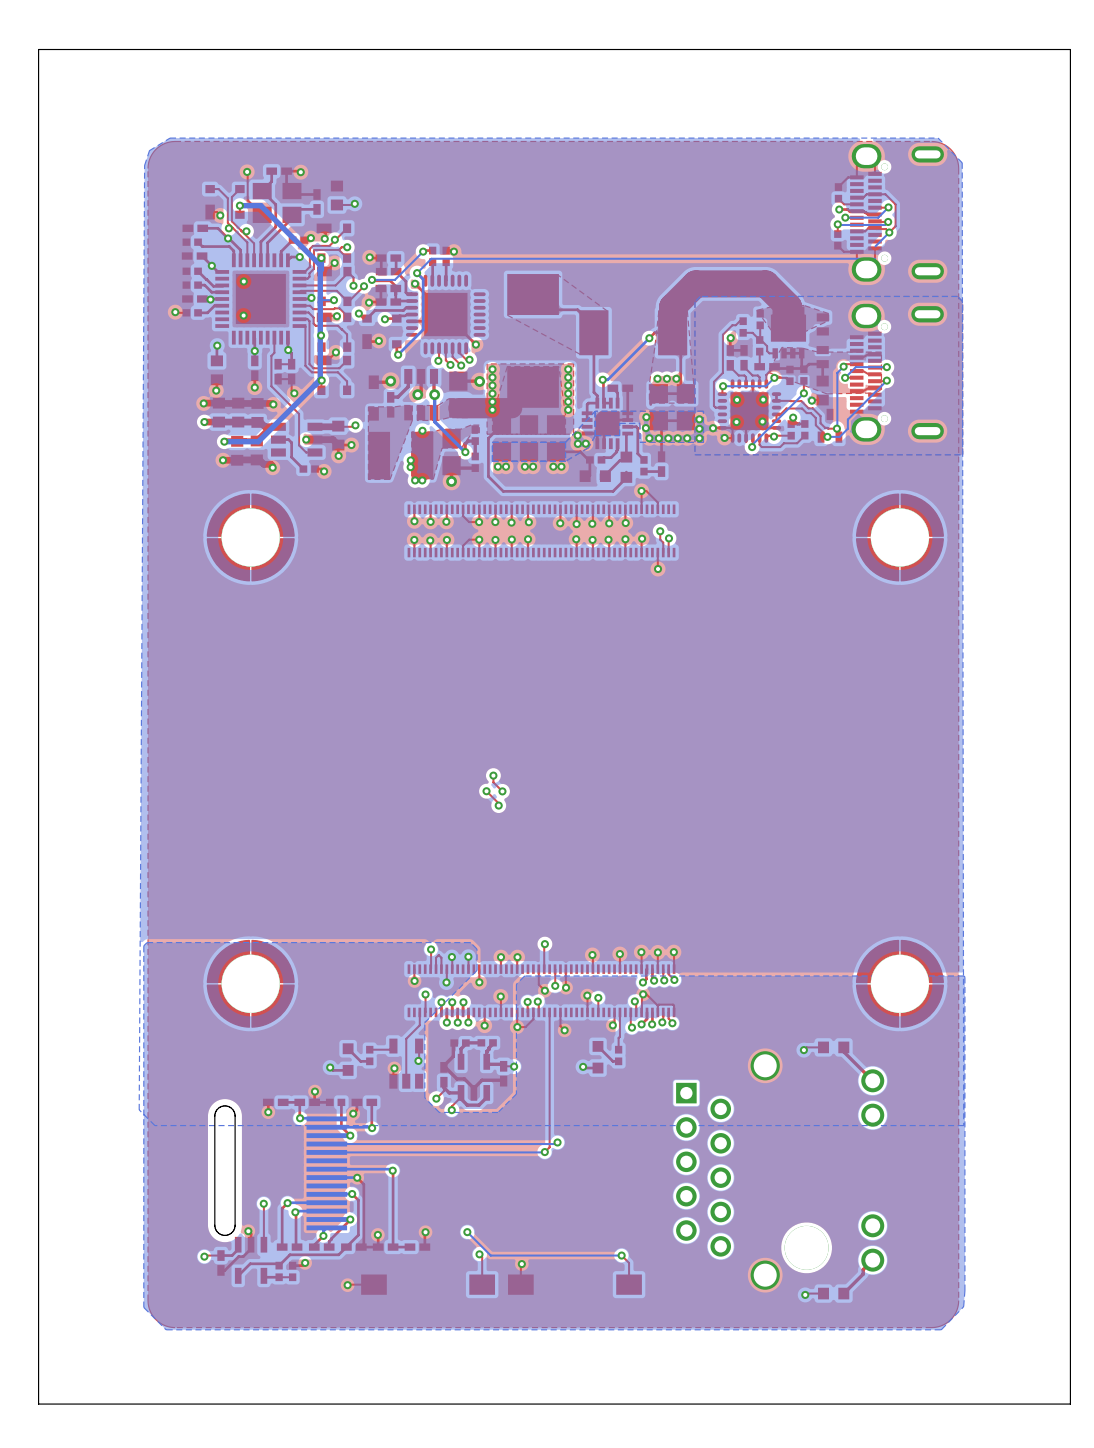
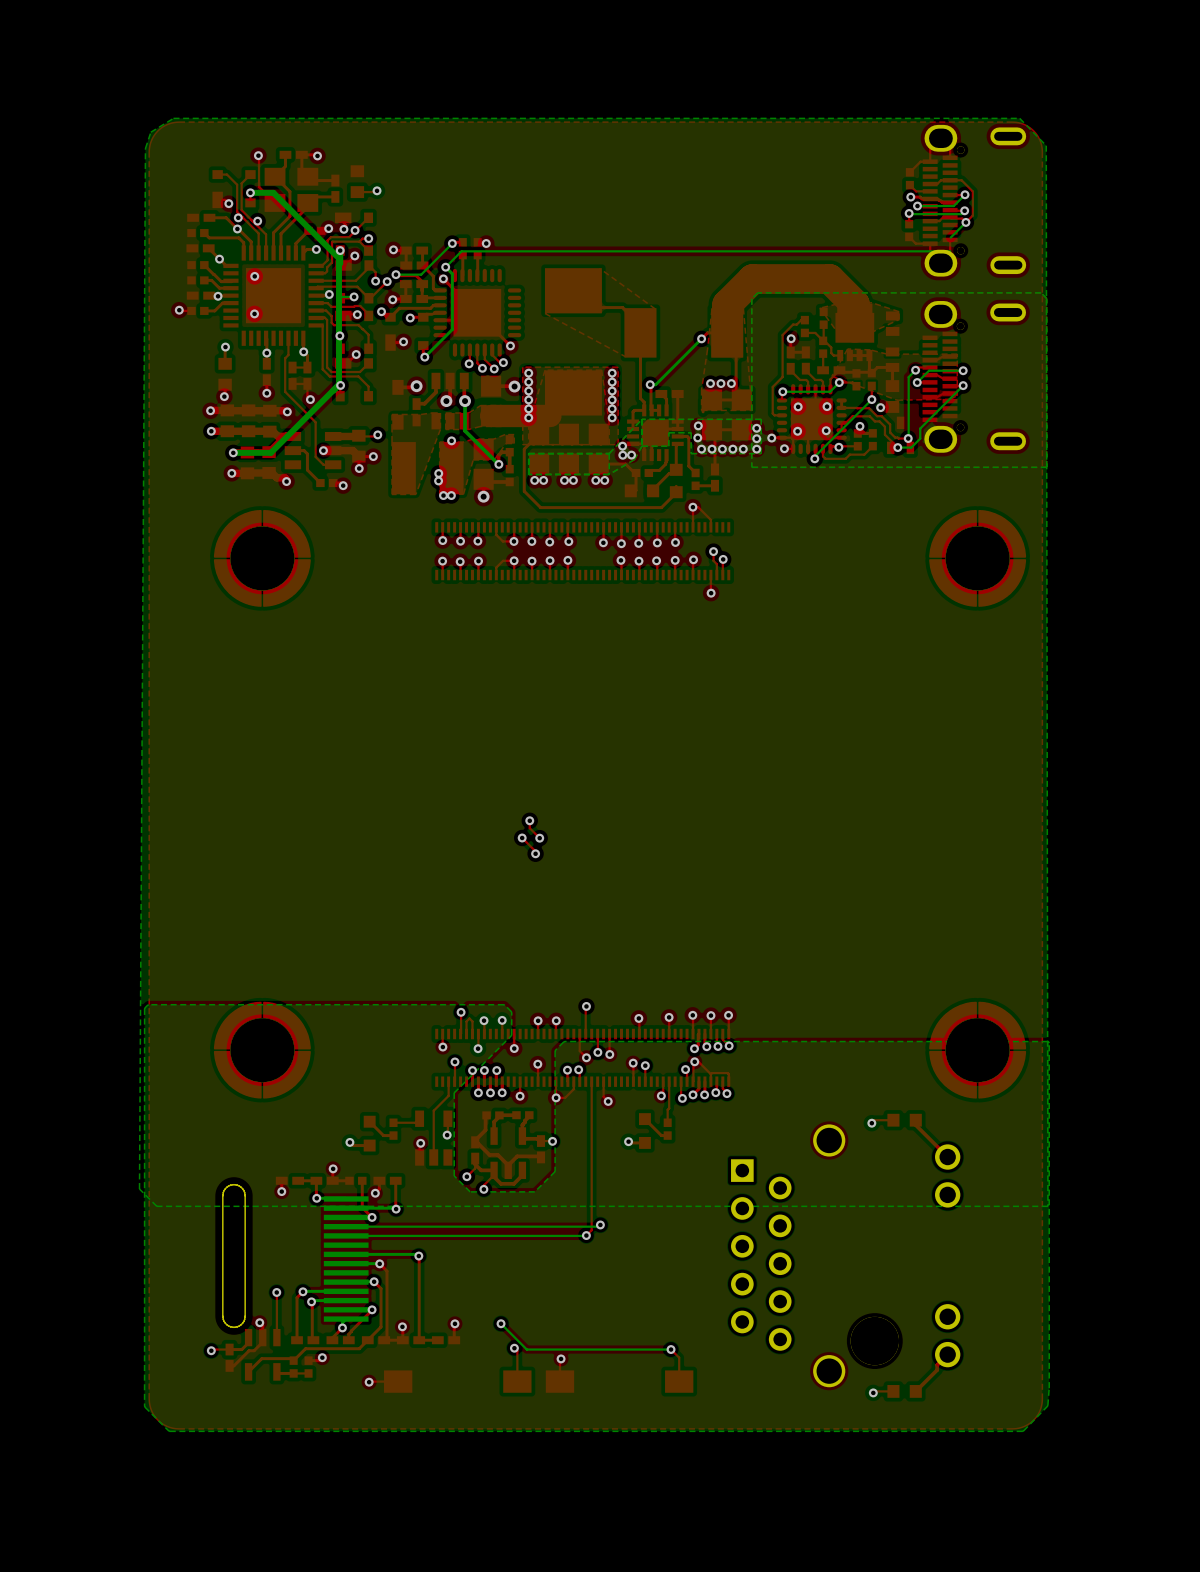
board edge: (1070, 49) (38, 49) (38, 1404) (1070, 1404) (1070, 49) -> none

